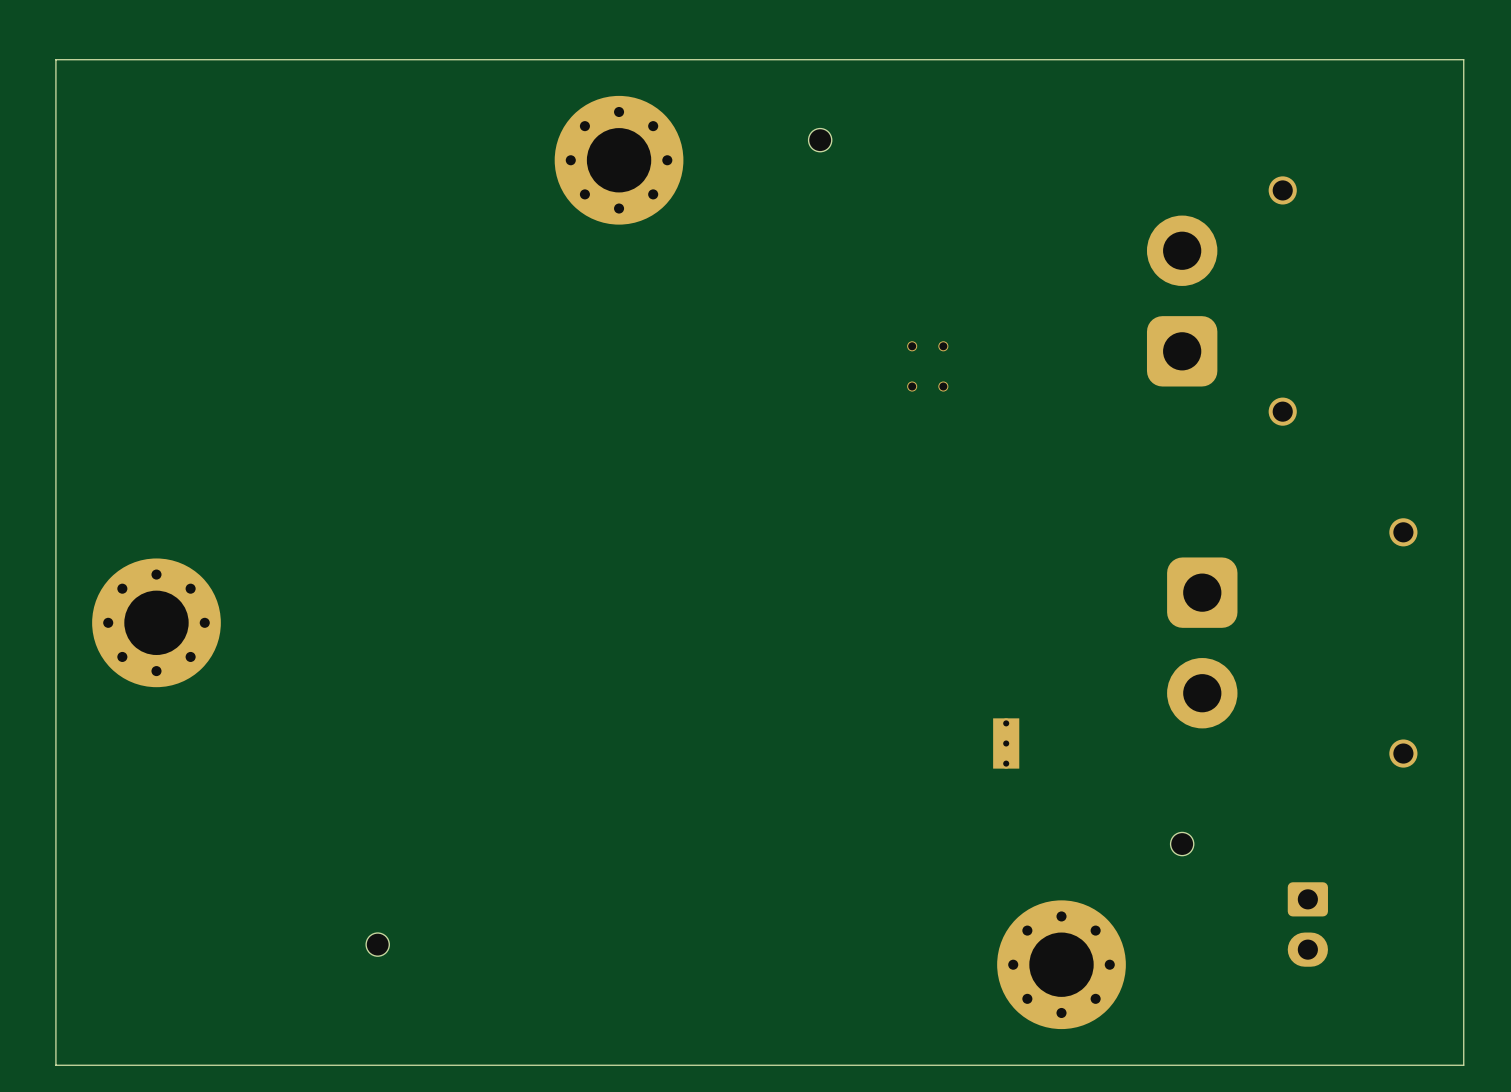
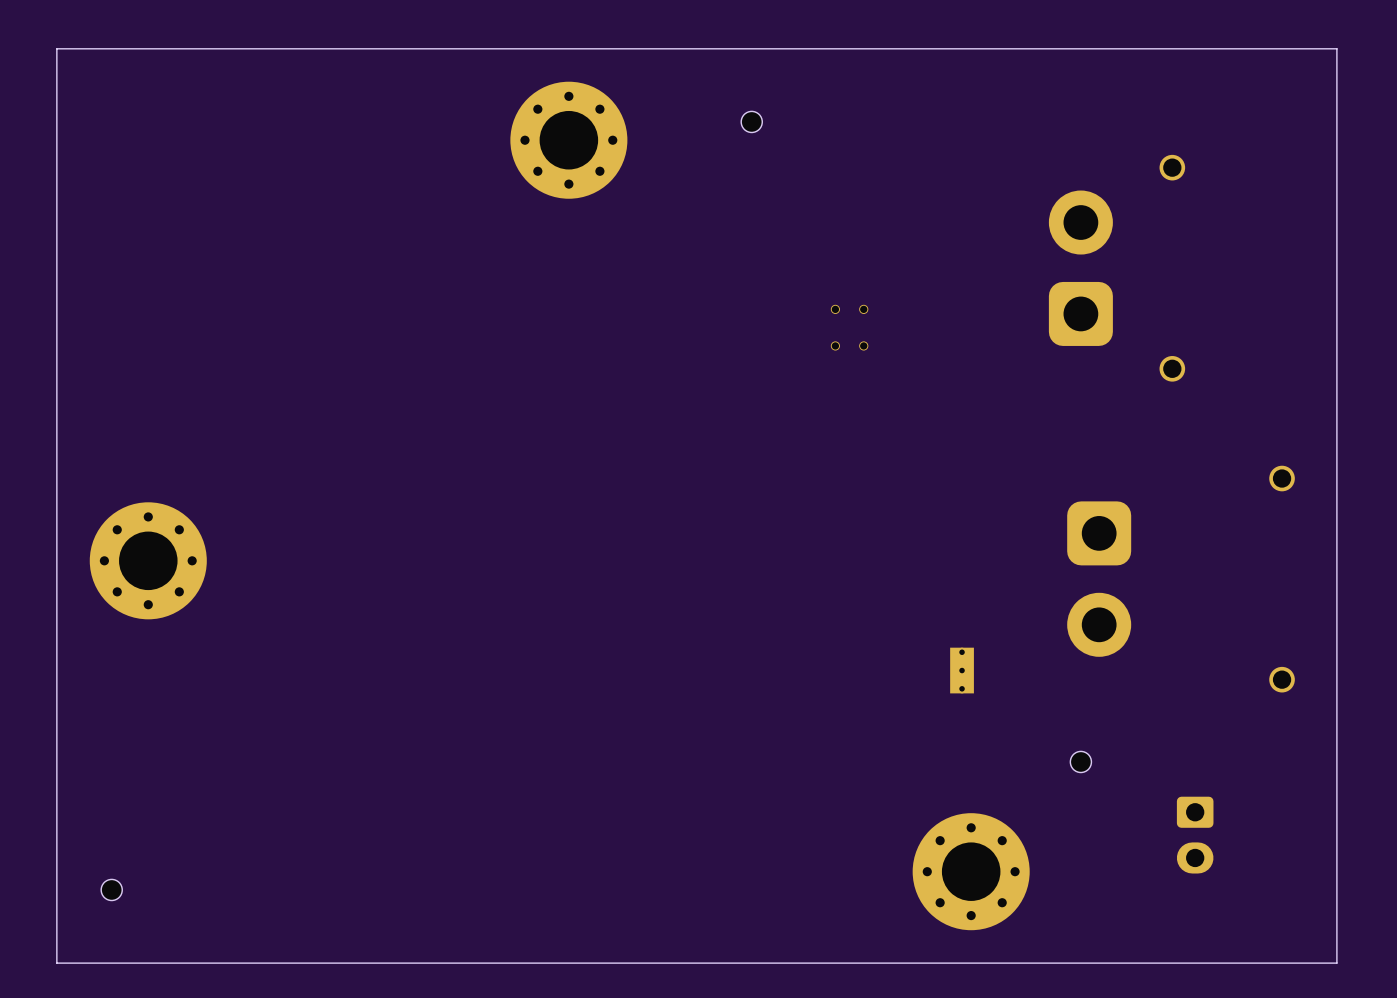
part position: (1006, 743) -> (962, 670)
part position: (377, 944) -> (111, 889)

